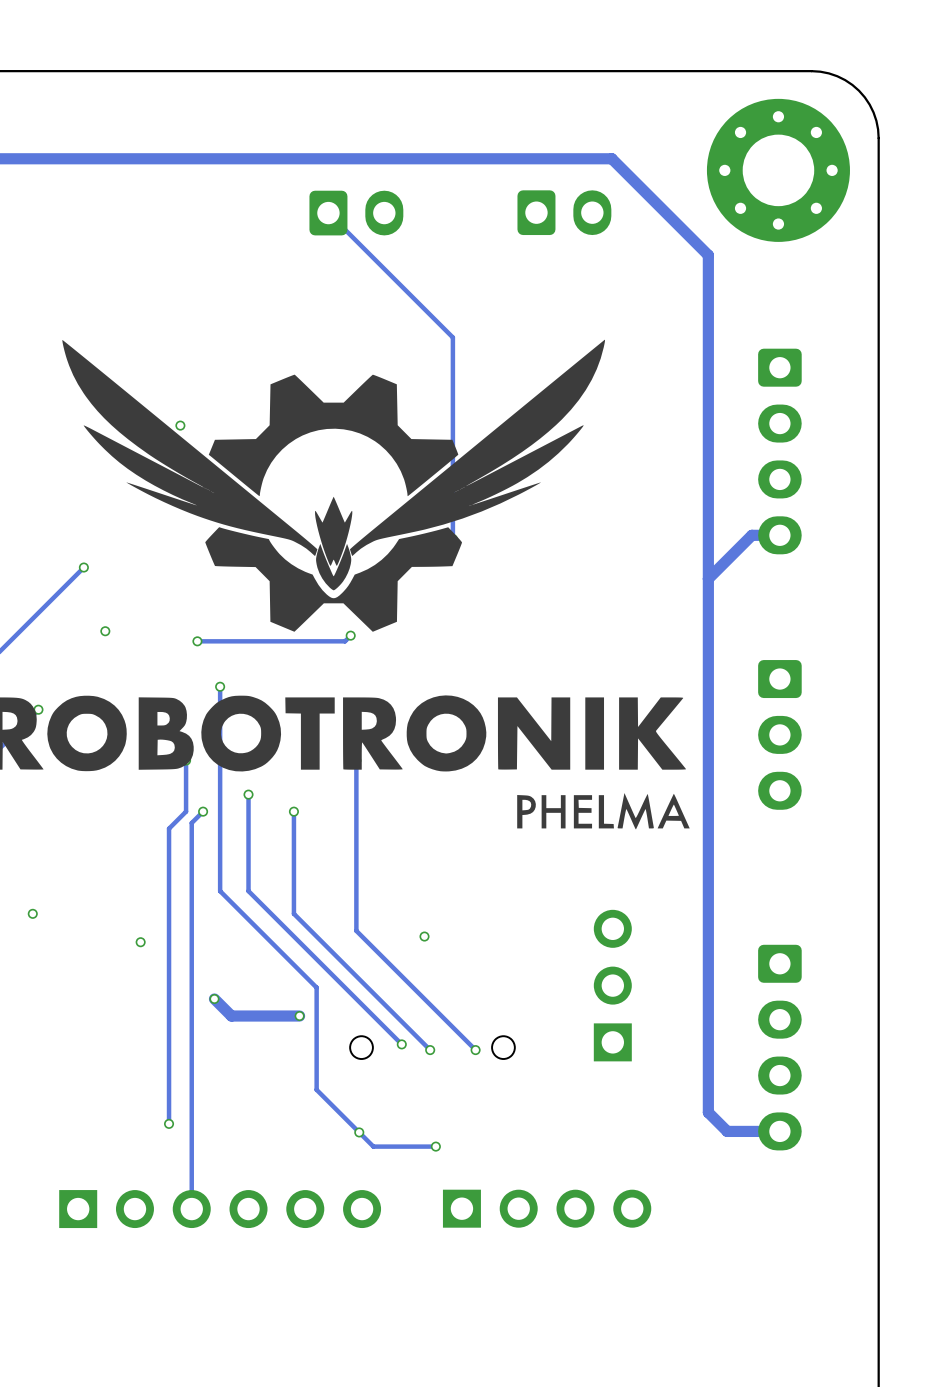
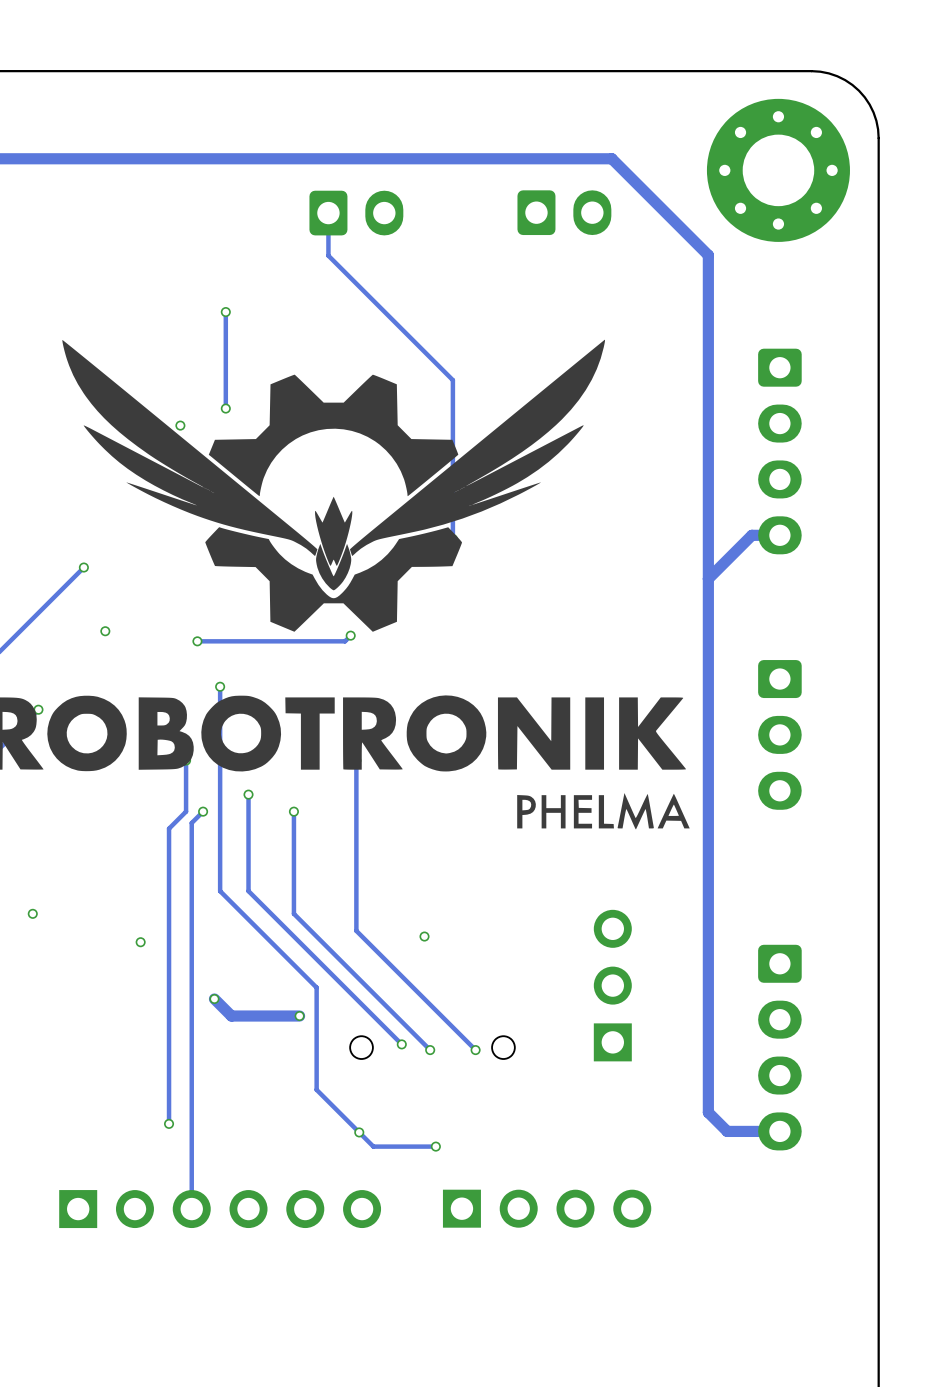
track: (328, 213) (452, 337) (452, 380) -> (328, 213) (328, 255) (452, 380)
track: none -> (225, 312) (225, 408)
via: none -> (225, 312)
via: none -> (225, 408)

